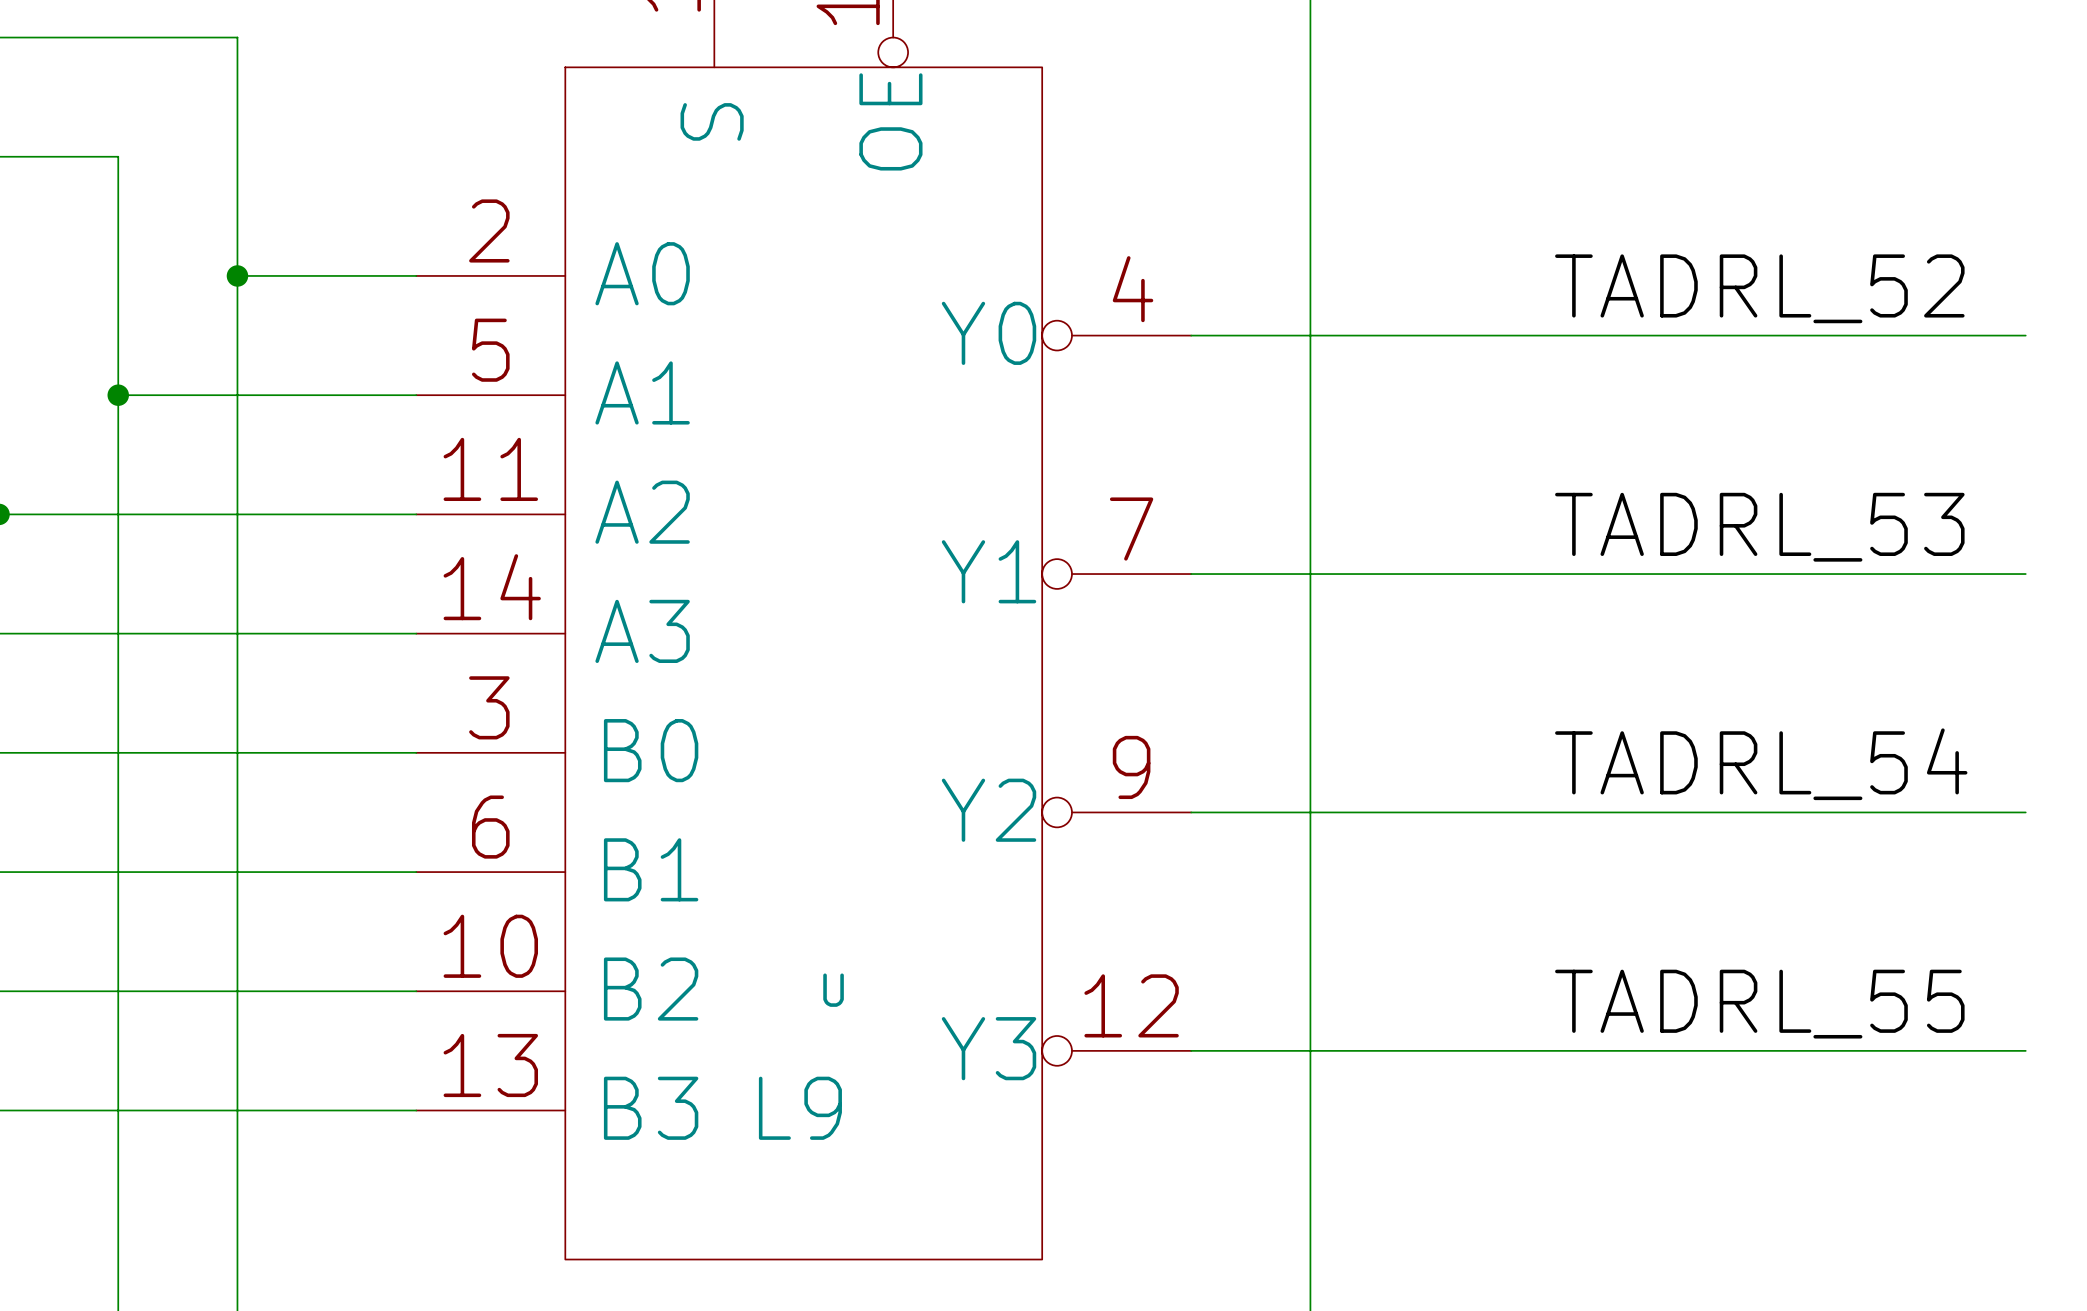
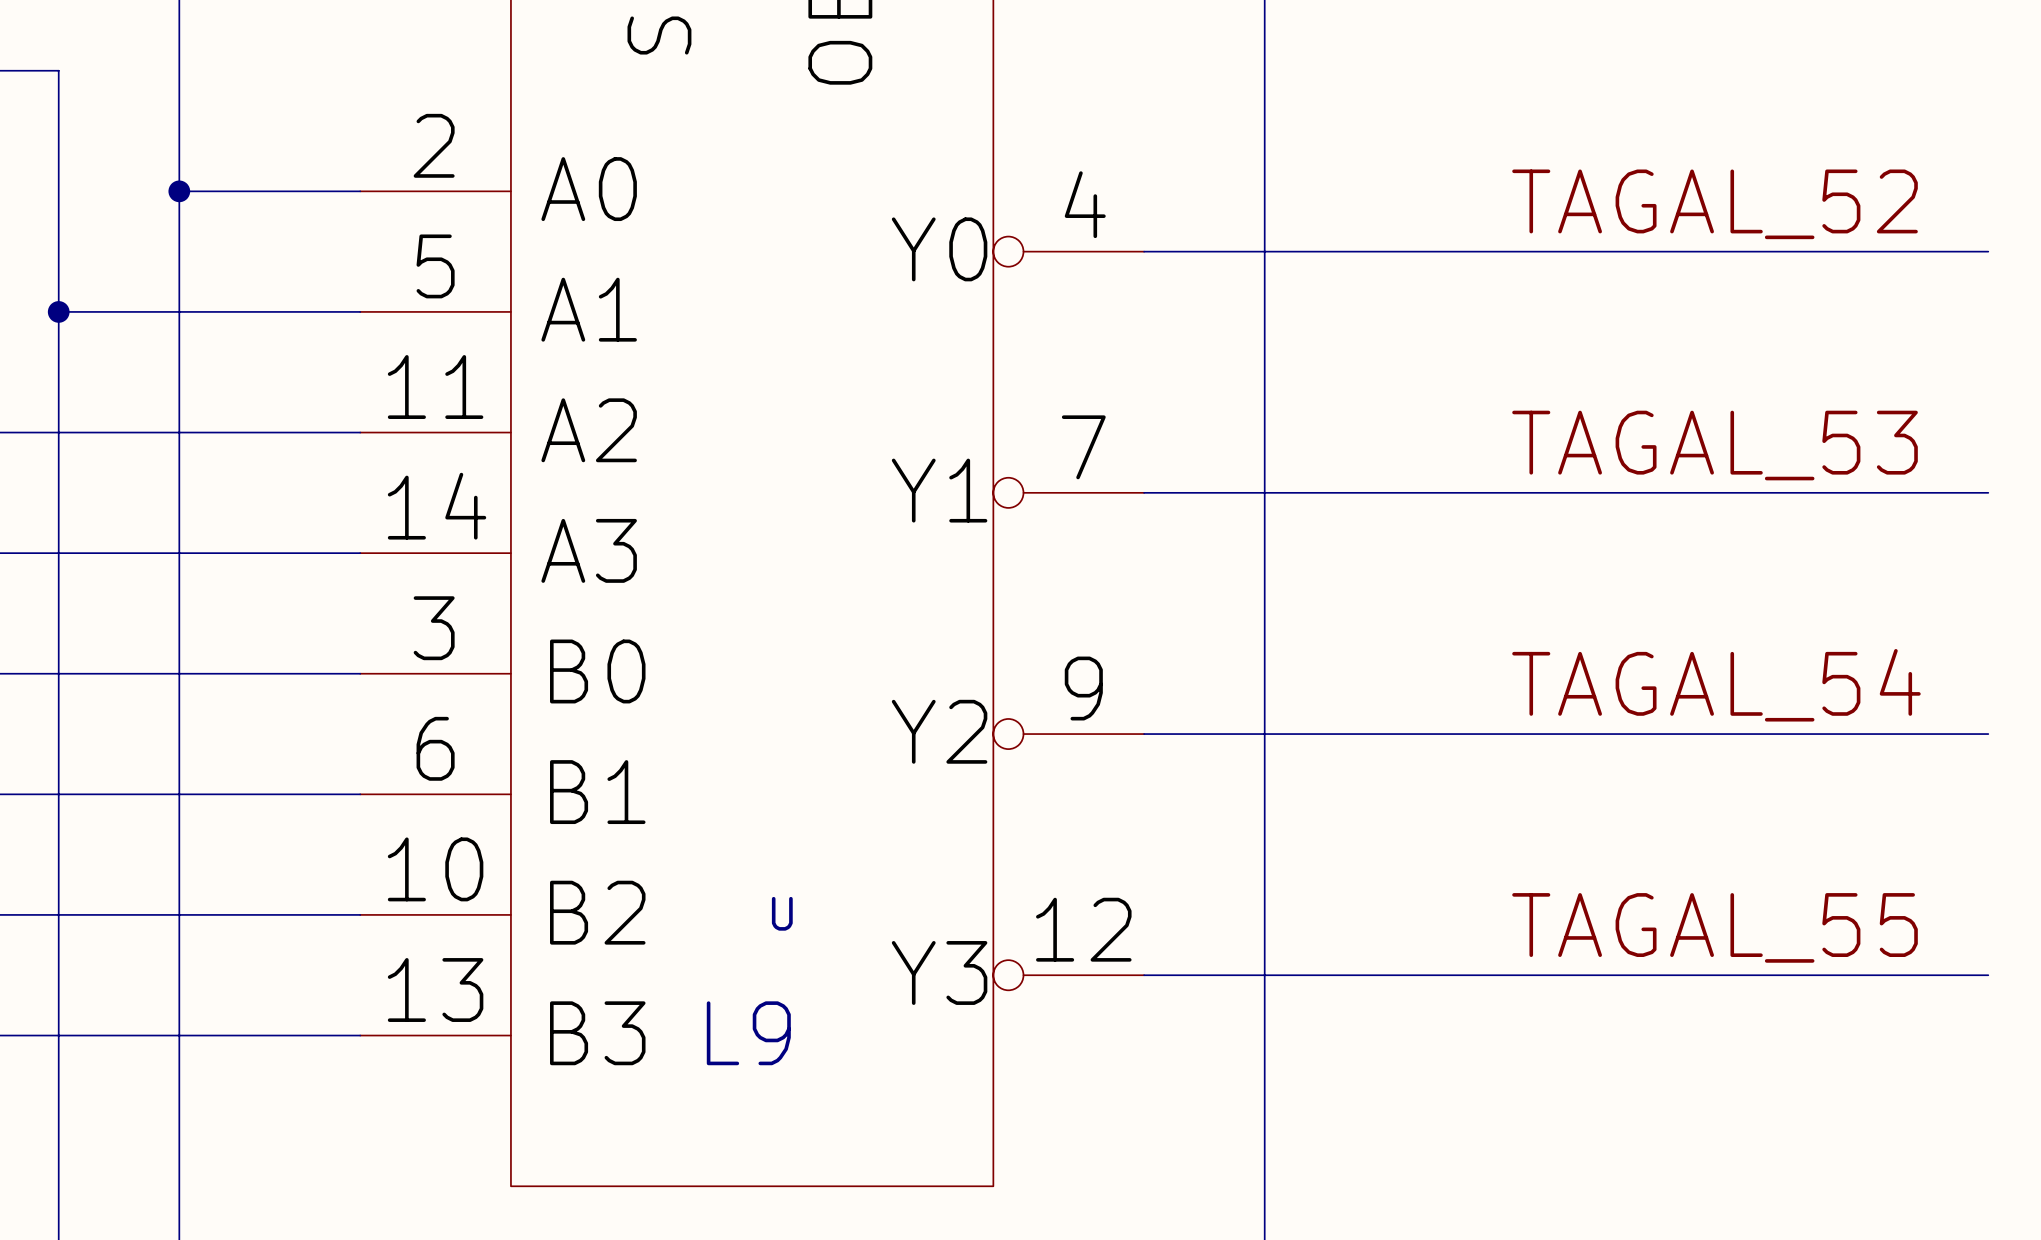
label: TADRL_52 (1759, 288) -> TAGAL_52 (1715, 204)
label: TADRL_53 (1759, 527) -> TAGAL_53 (1715, 445)
label: TADRL_54 (1761, 764) -> TAGAL_54 (1716, 685)
label: TADRL_55 (1759, 1004) -> TAGAL_55 (1715, 927)

